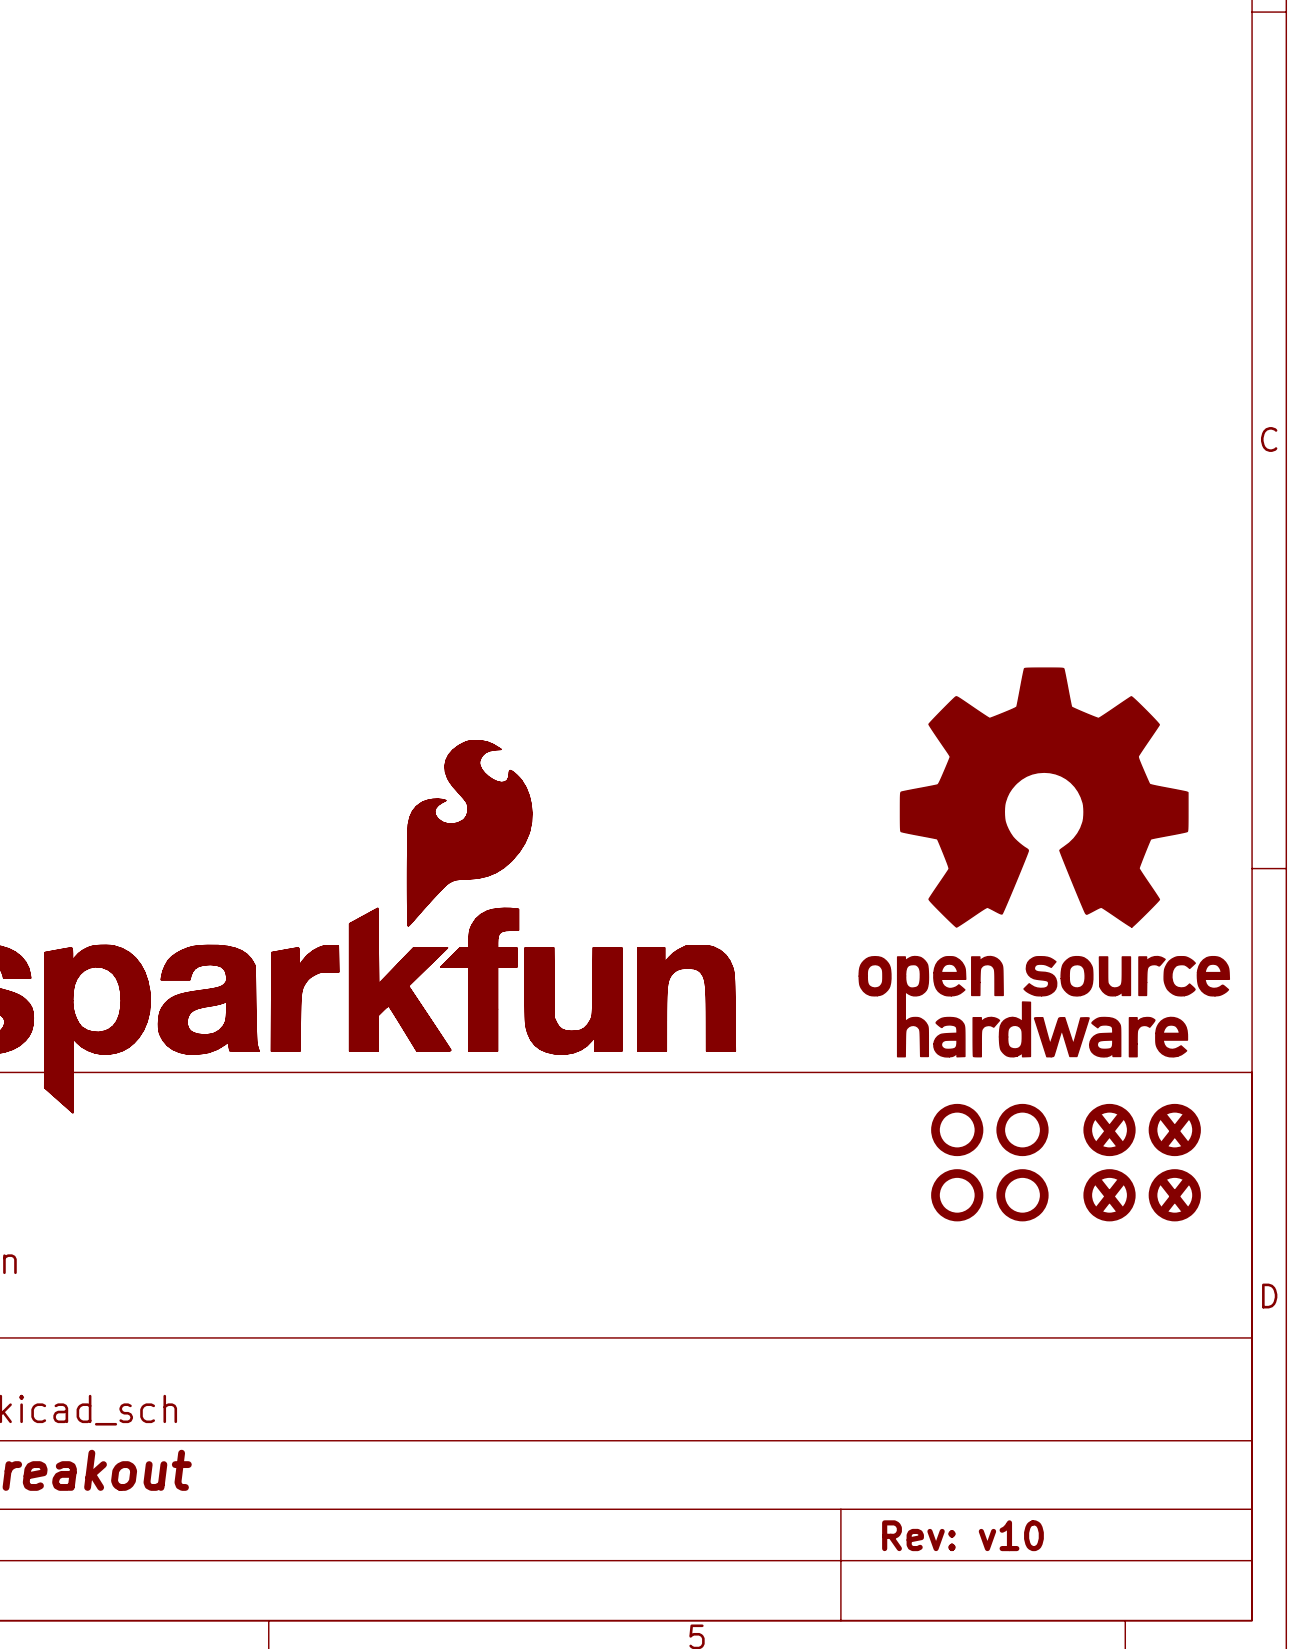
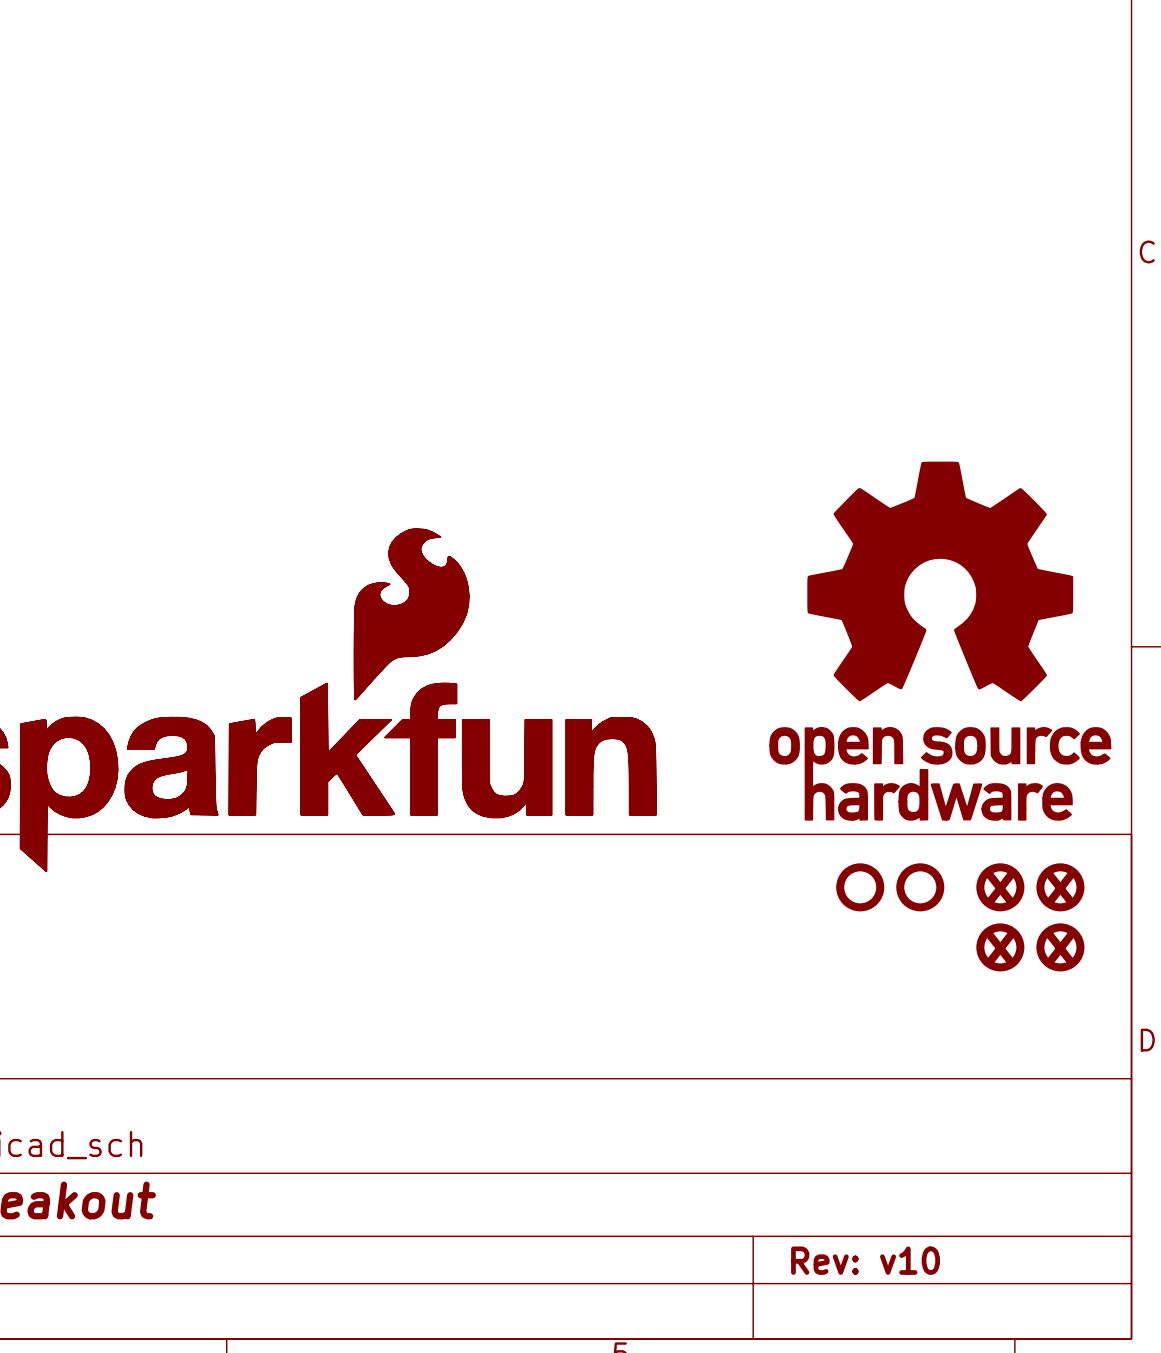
part: (957, 1195) -> none
part: (1022, 1195) -> none

